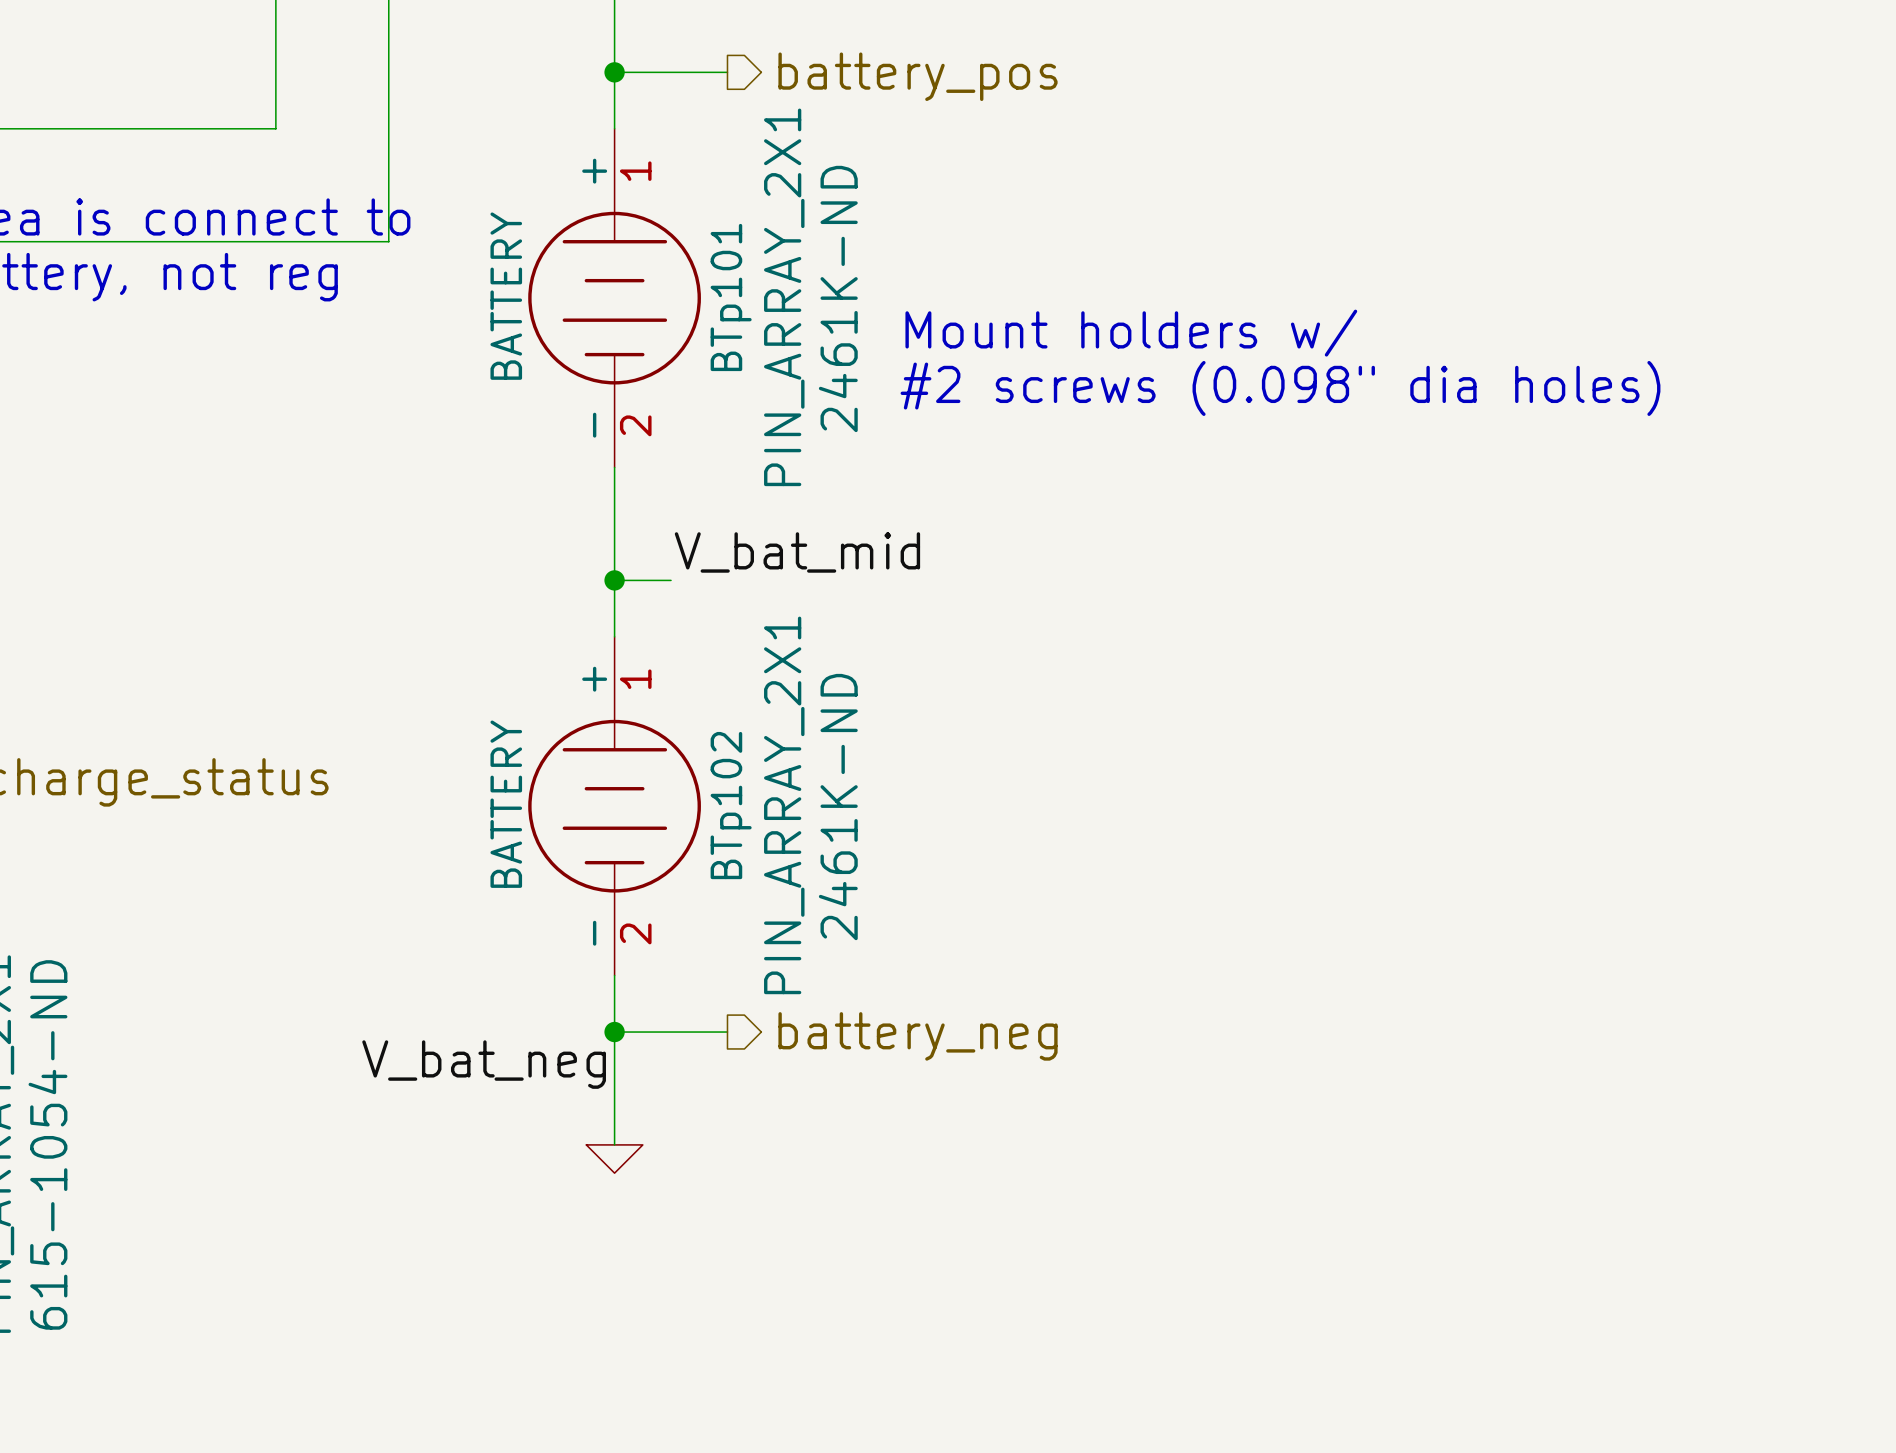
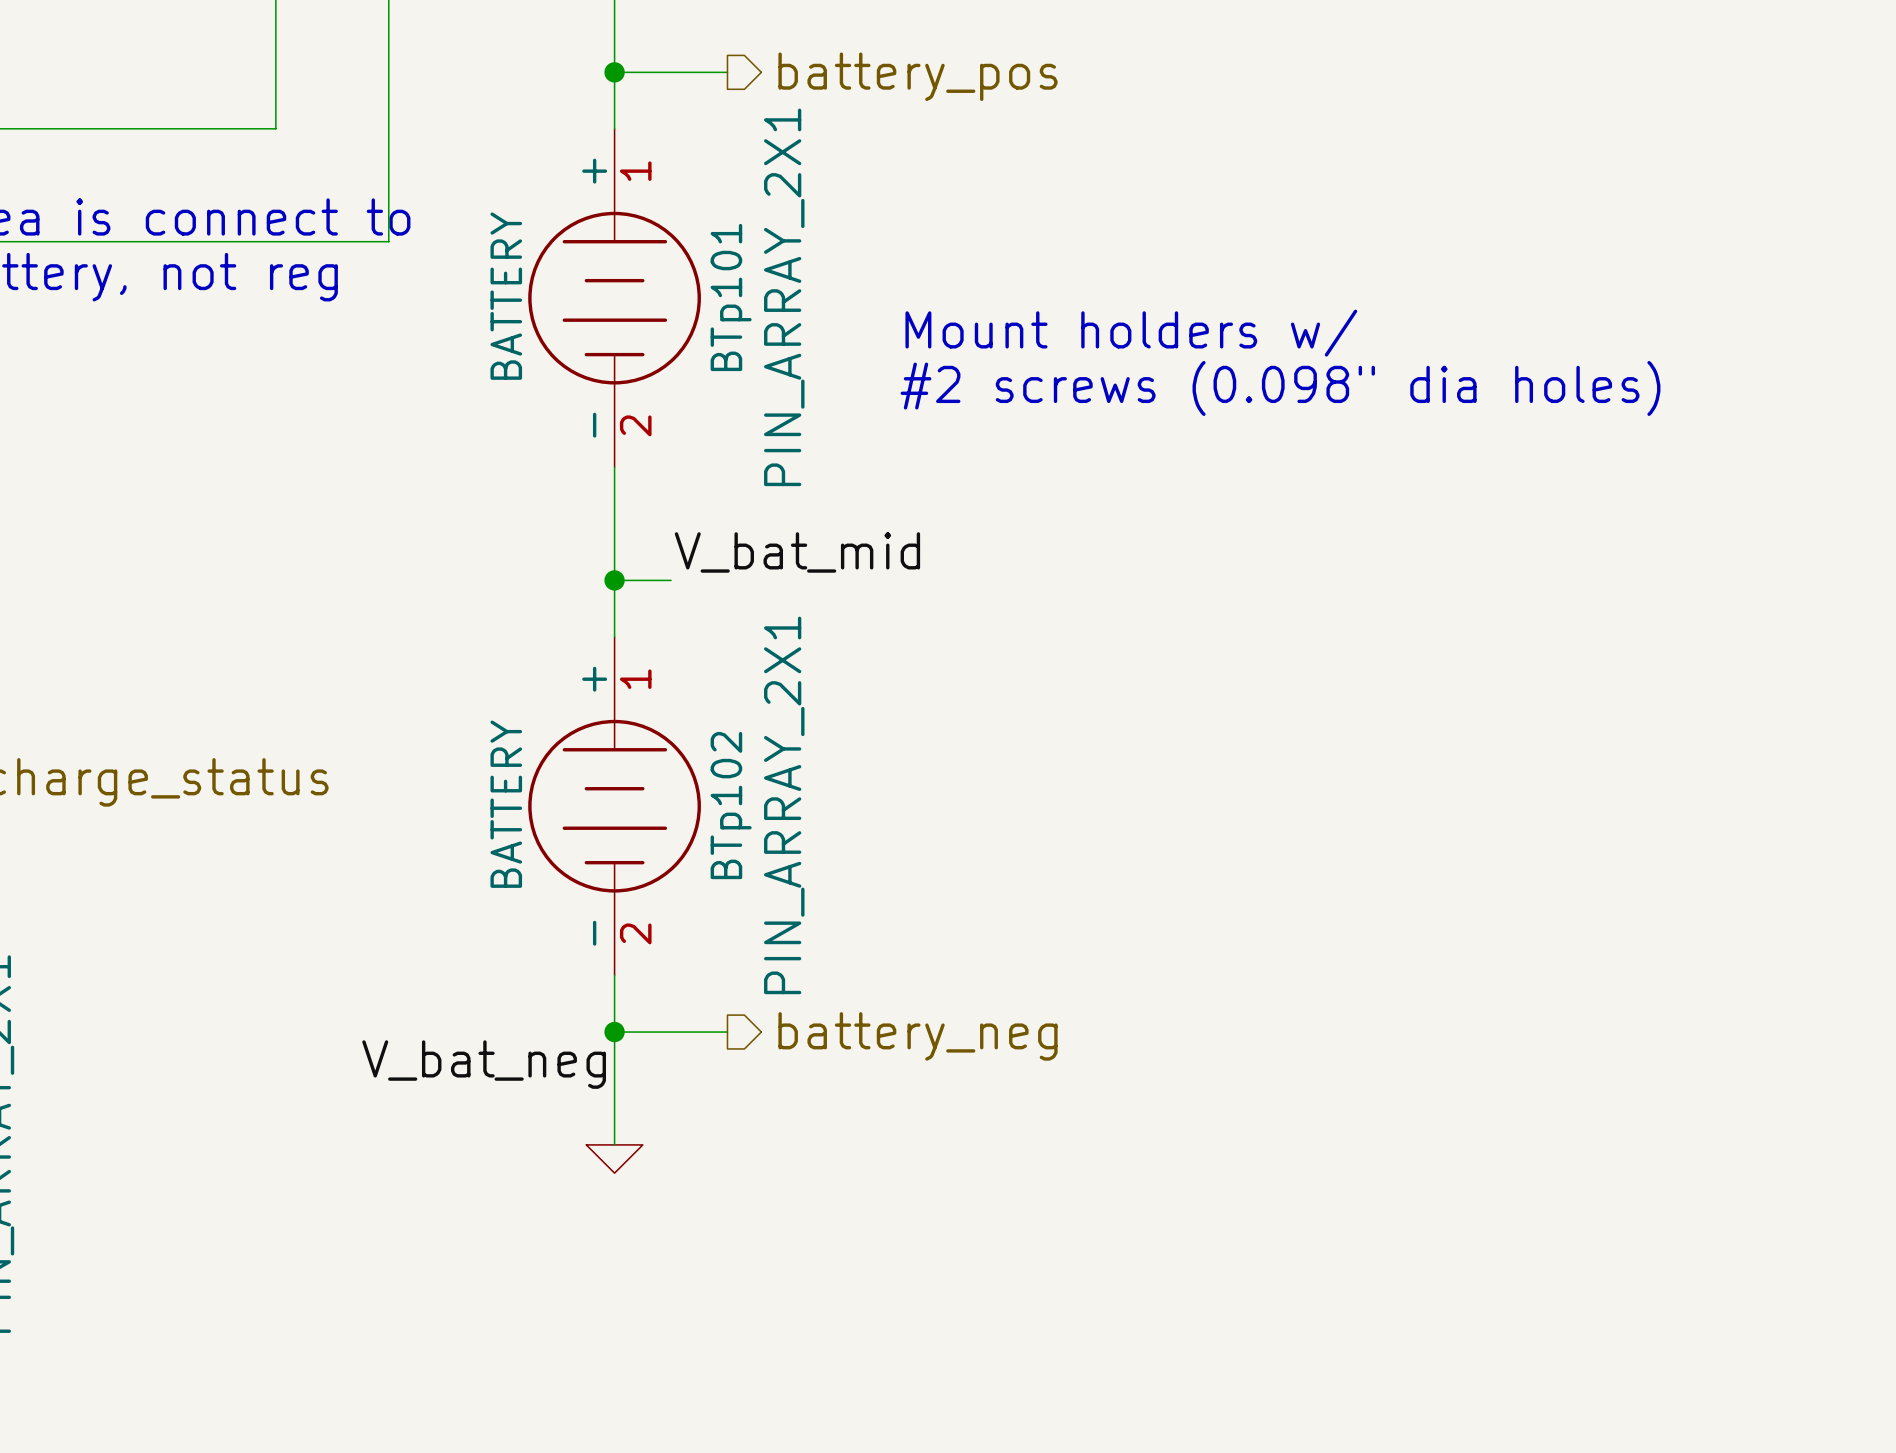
BTp101 text: 2461K-ND (838, 298) -> none
BTp102 text: 2461K-ND (838, 807) -> none
part text: 615-1054-ND (47, 1144) -> none

